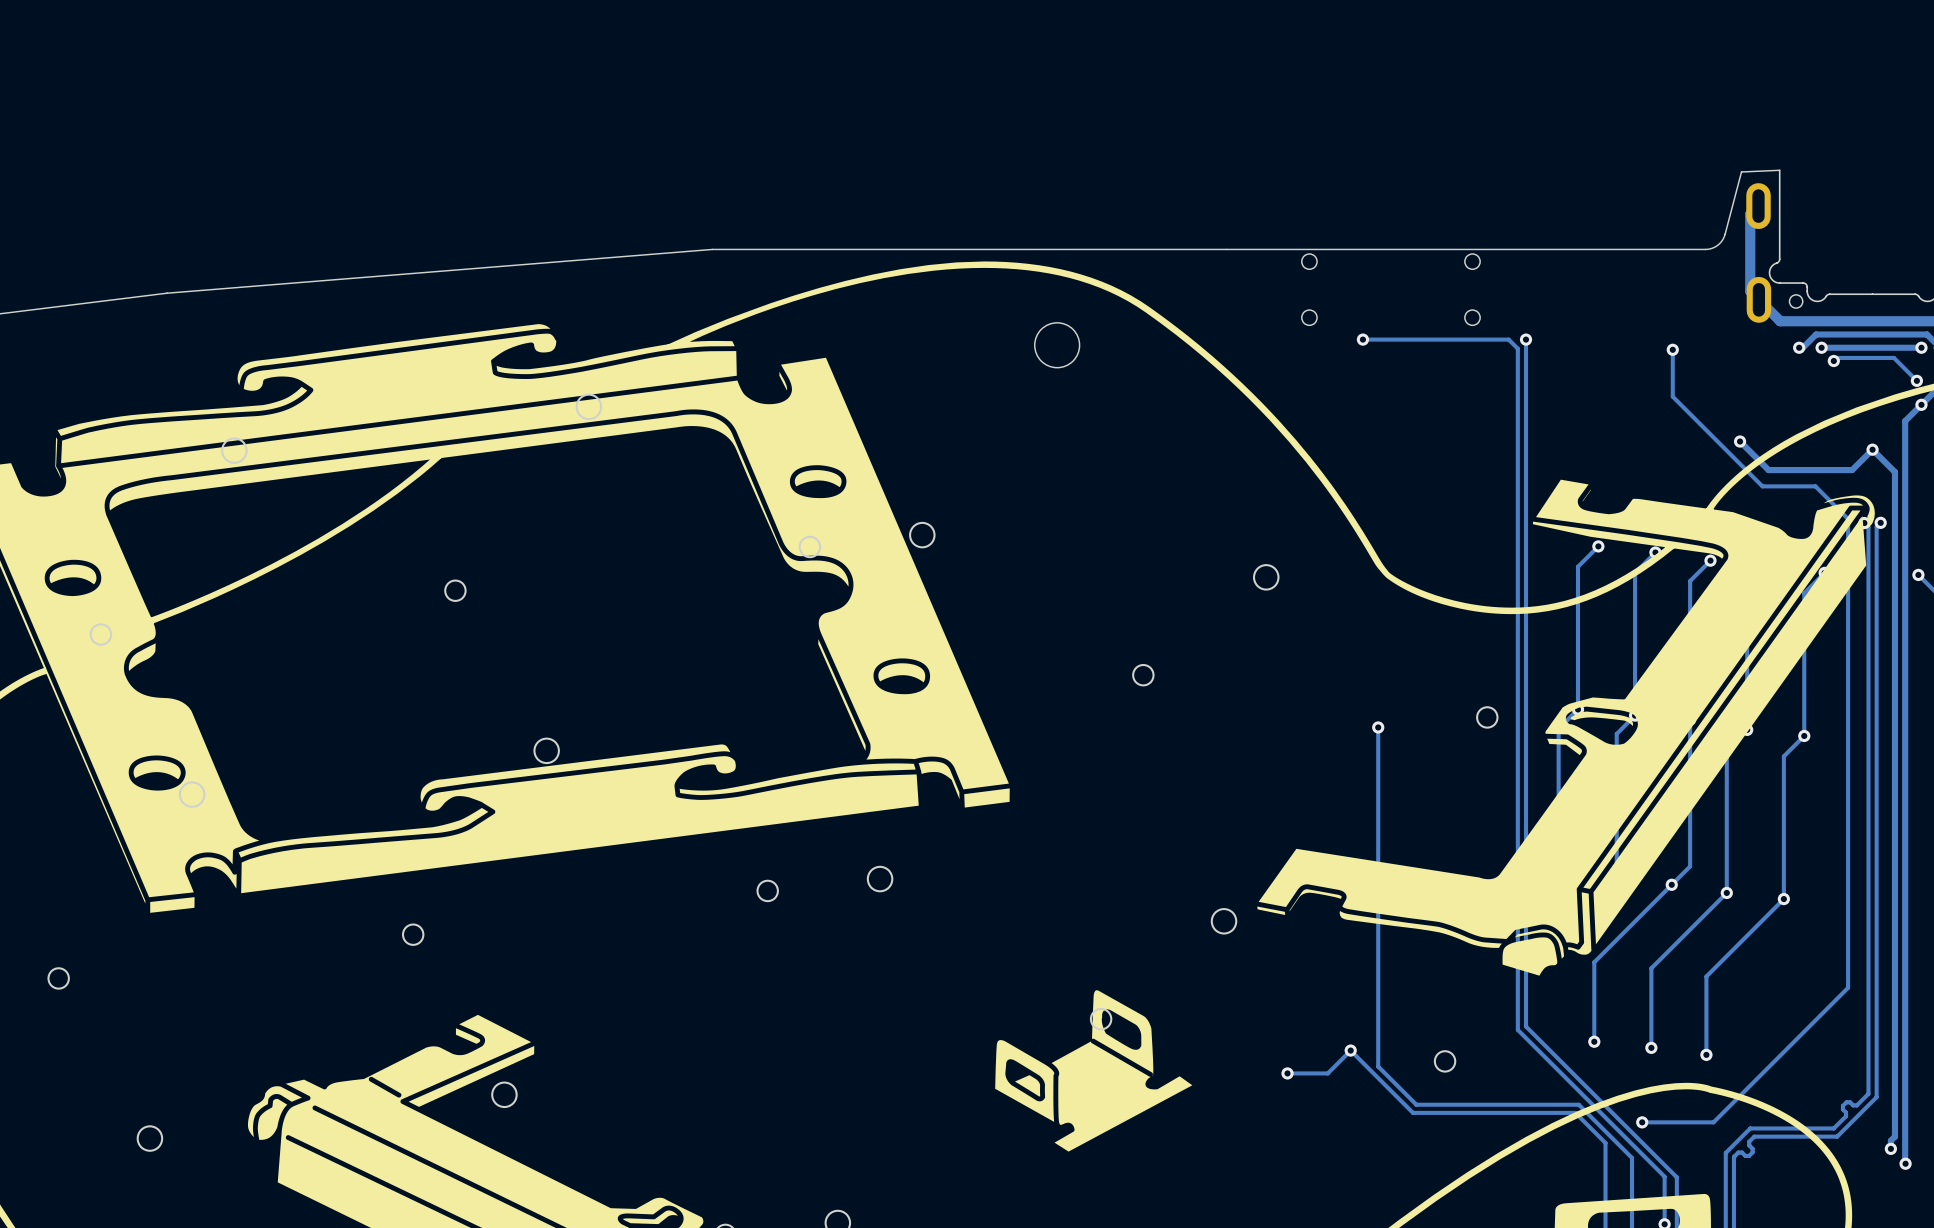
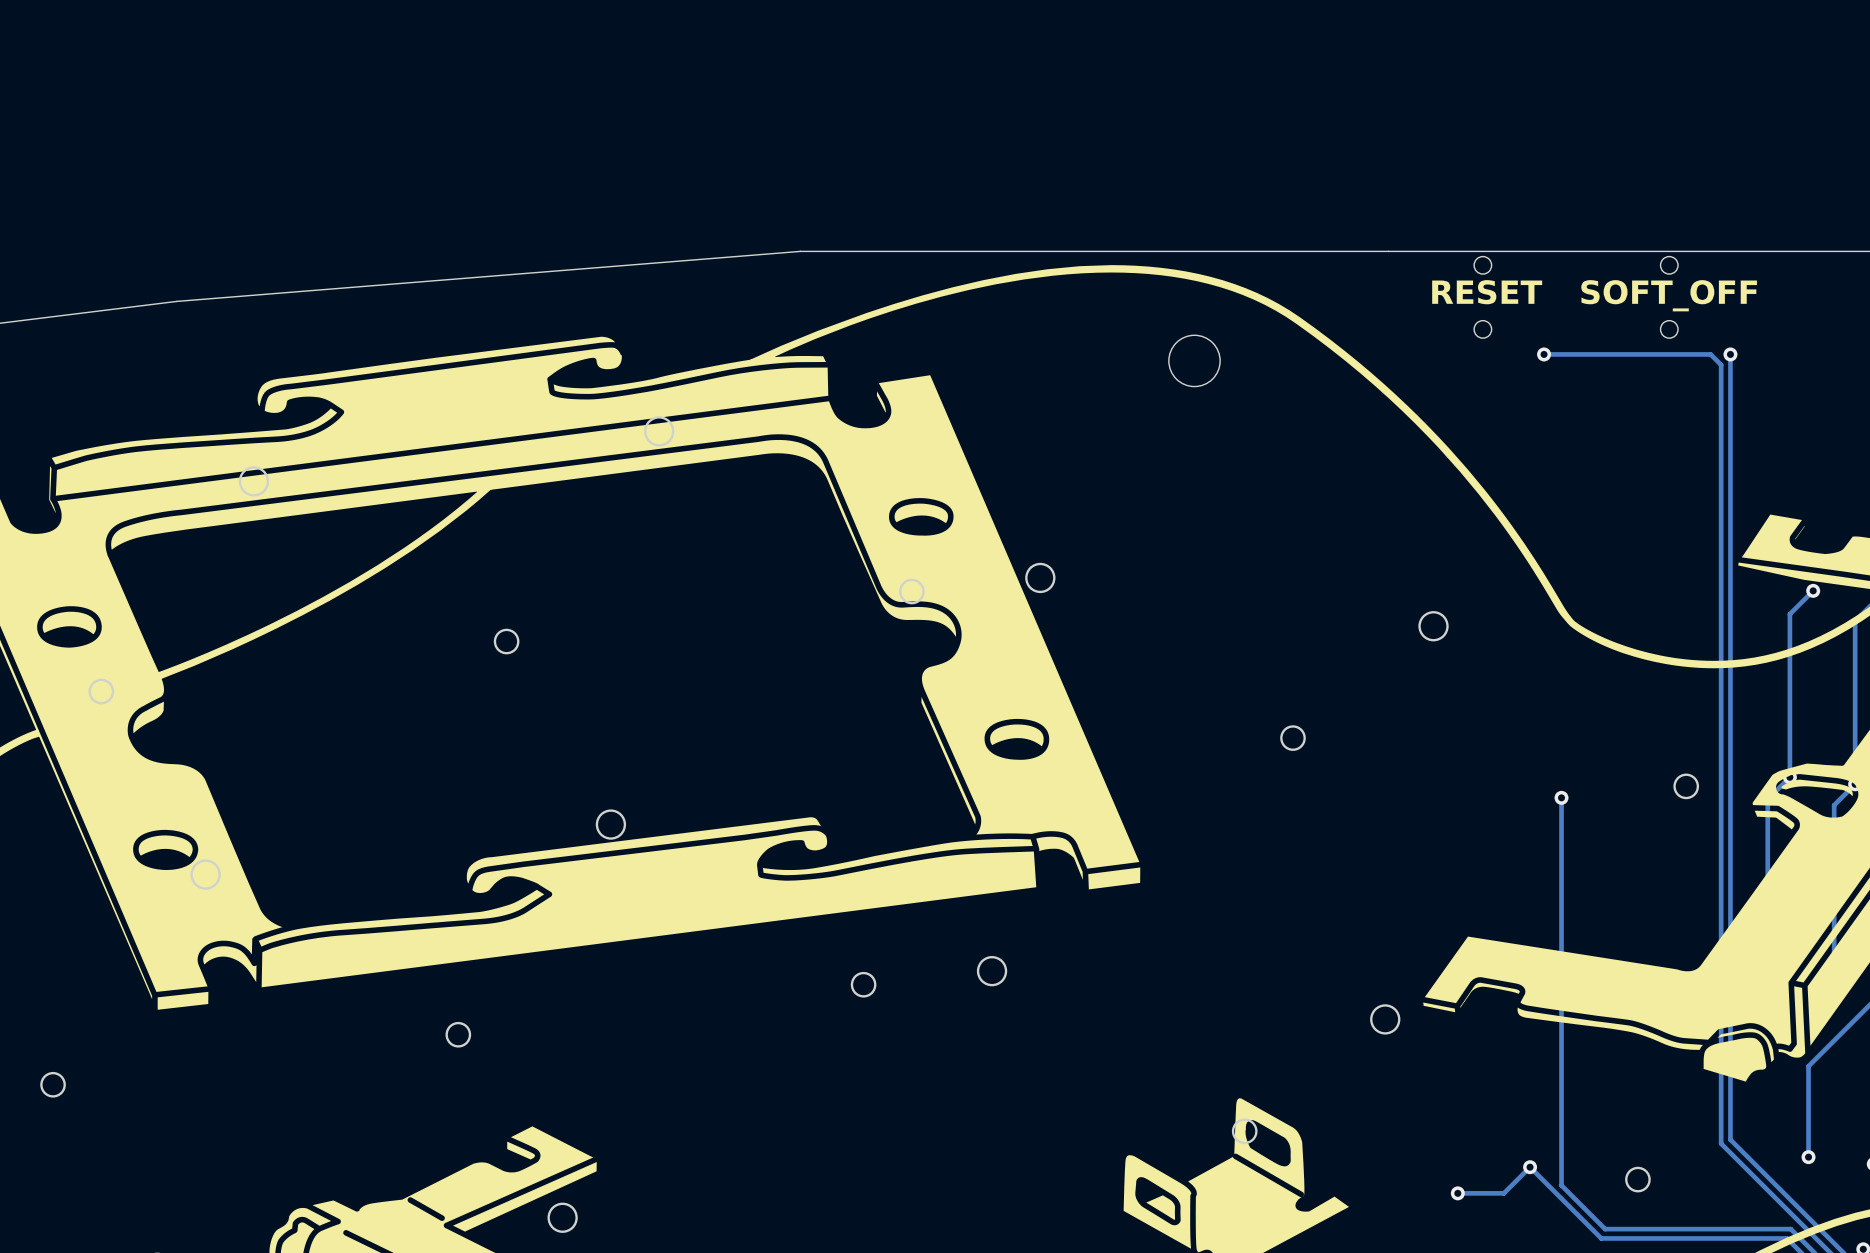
text: none -> RESET (1487, 292)
text: none -> SOFT_OFF (1669, 295)

